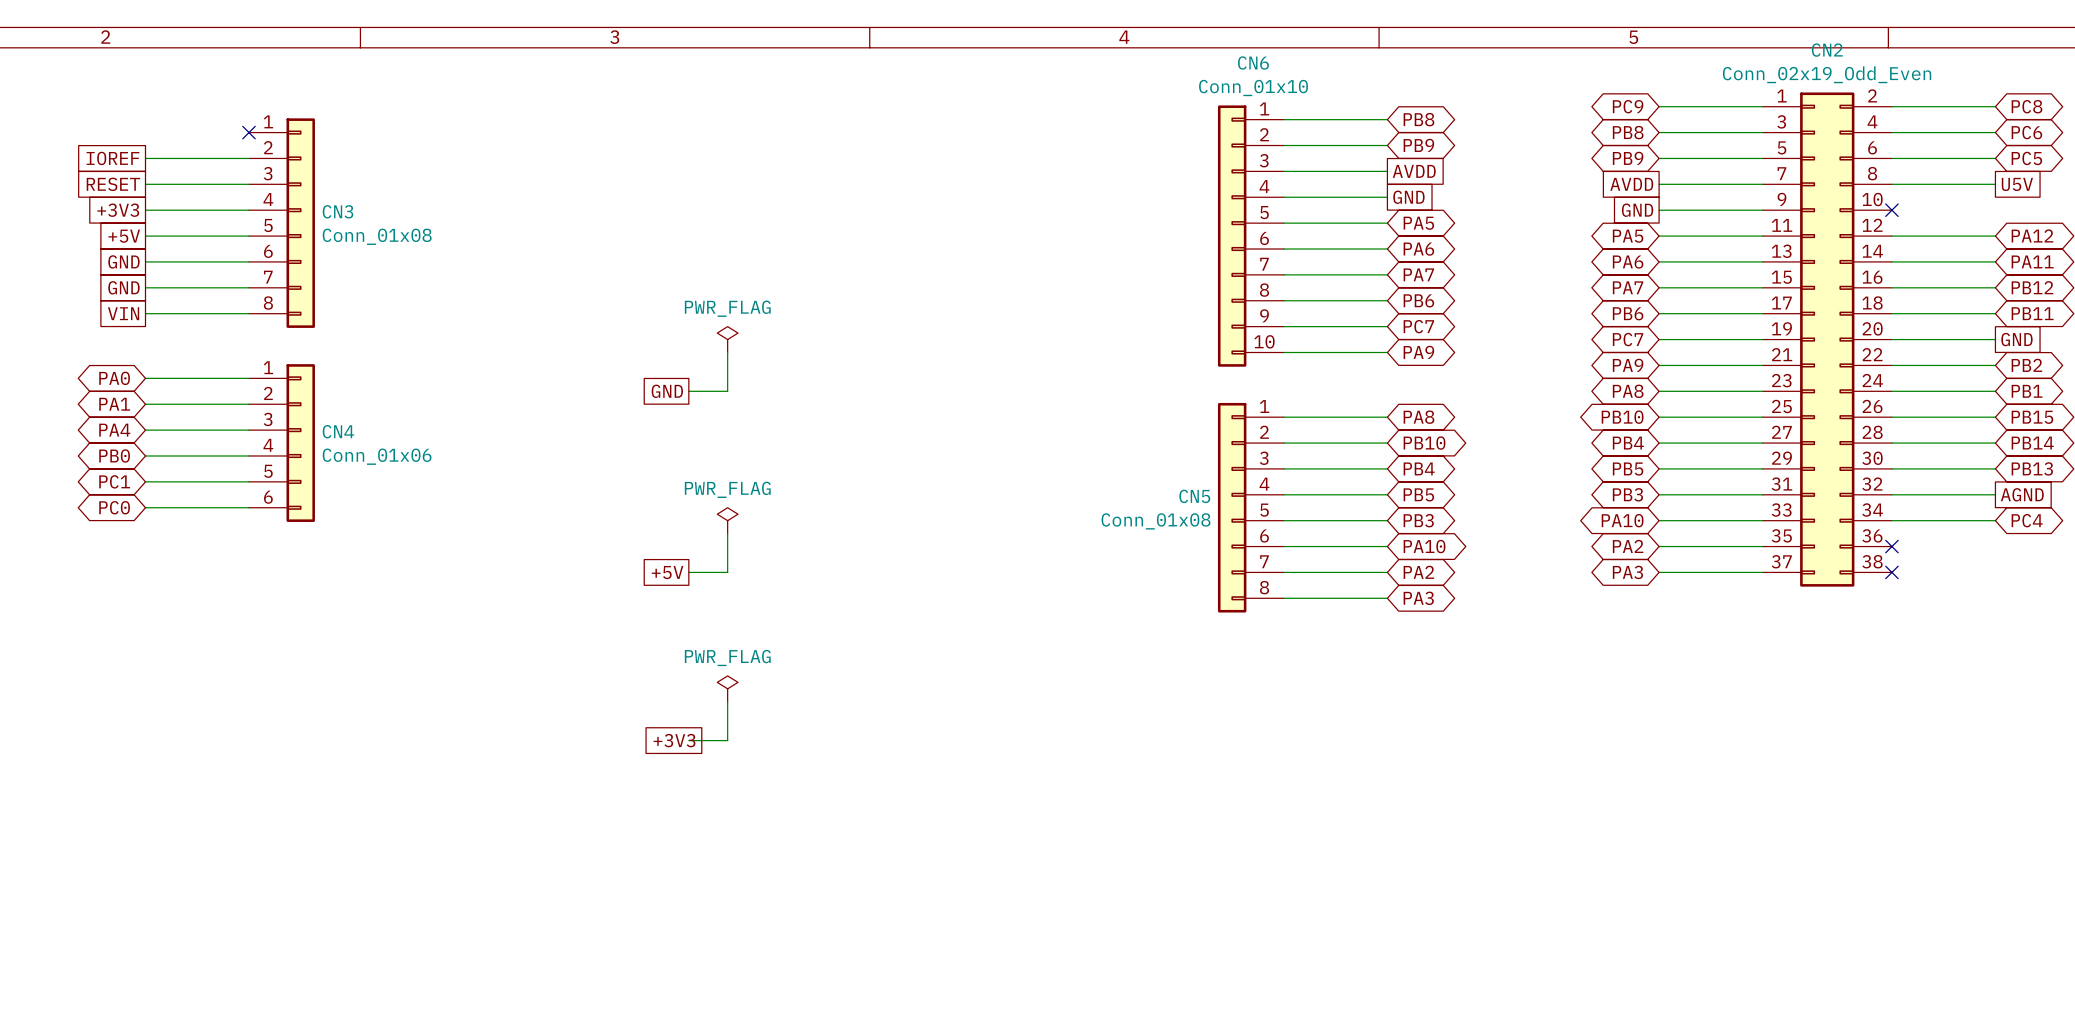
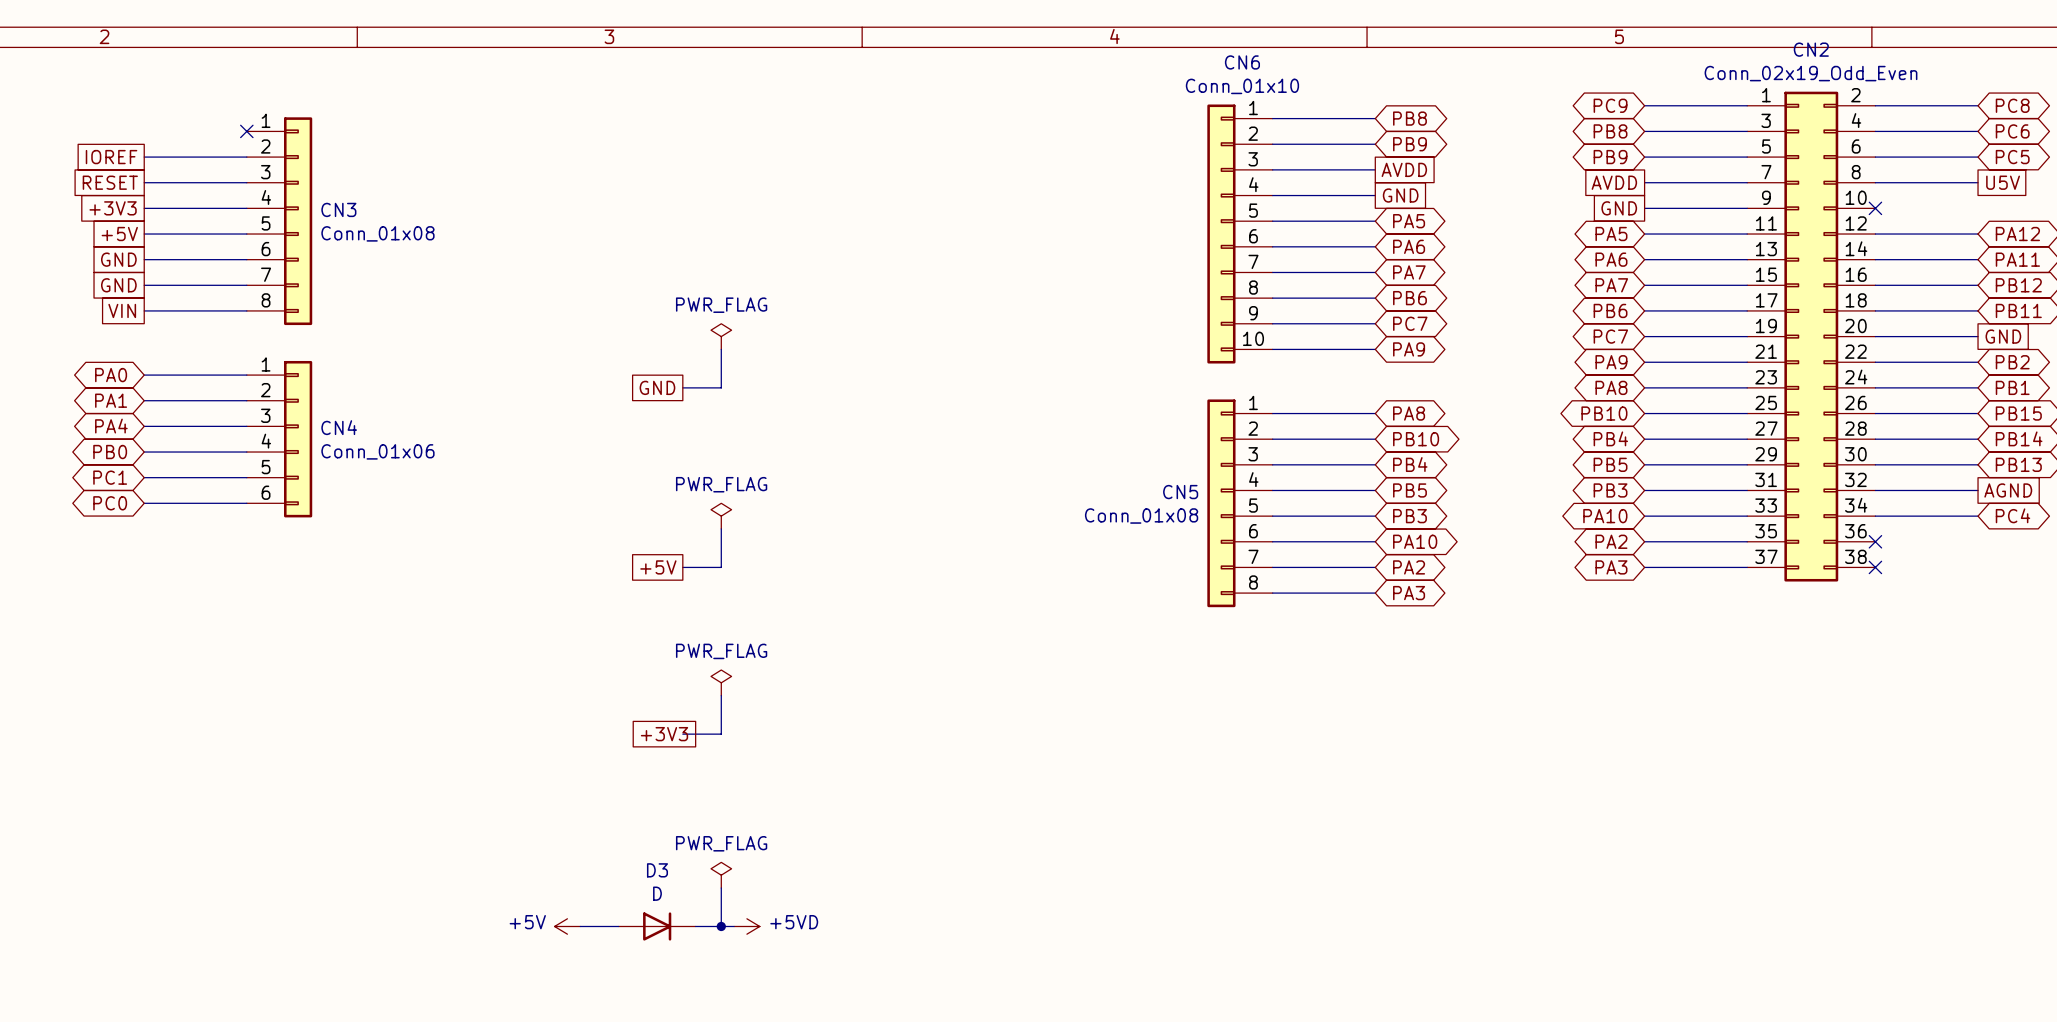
power symbol: none -> PWR_FLAG (721, 875)
wire: none -> (721, 888) (721, 926)
power symbol: none -> +5V (567, 926)
wire: none -> (580, 926) (618, 926)
D3: none -> D (657, 926)
wire: none -> (695, 926) (734, 926)
junction: none -> (721, 926)
power symbol: none -> +5VD (746, 926)

